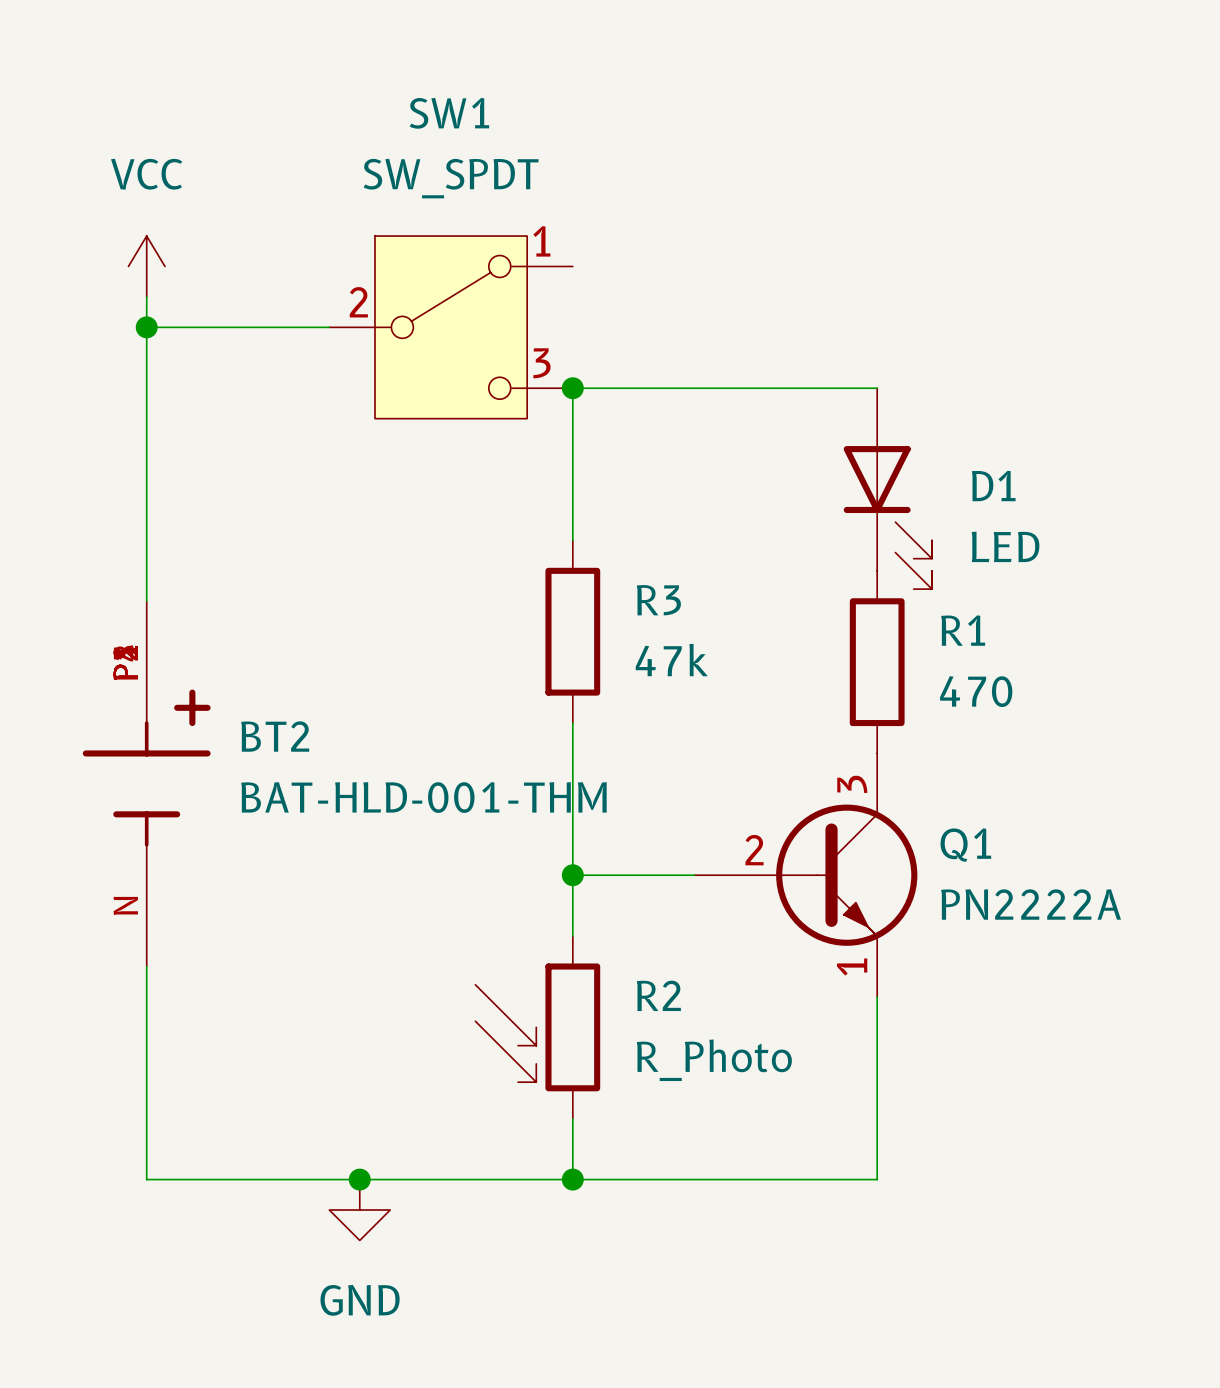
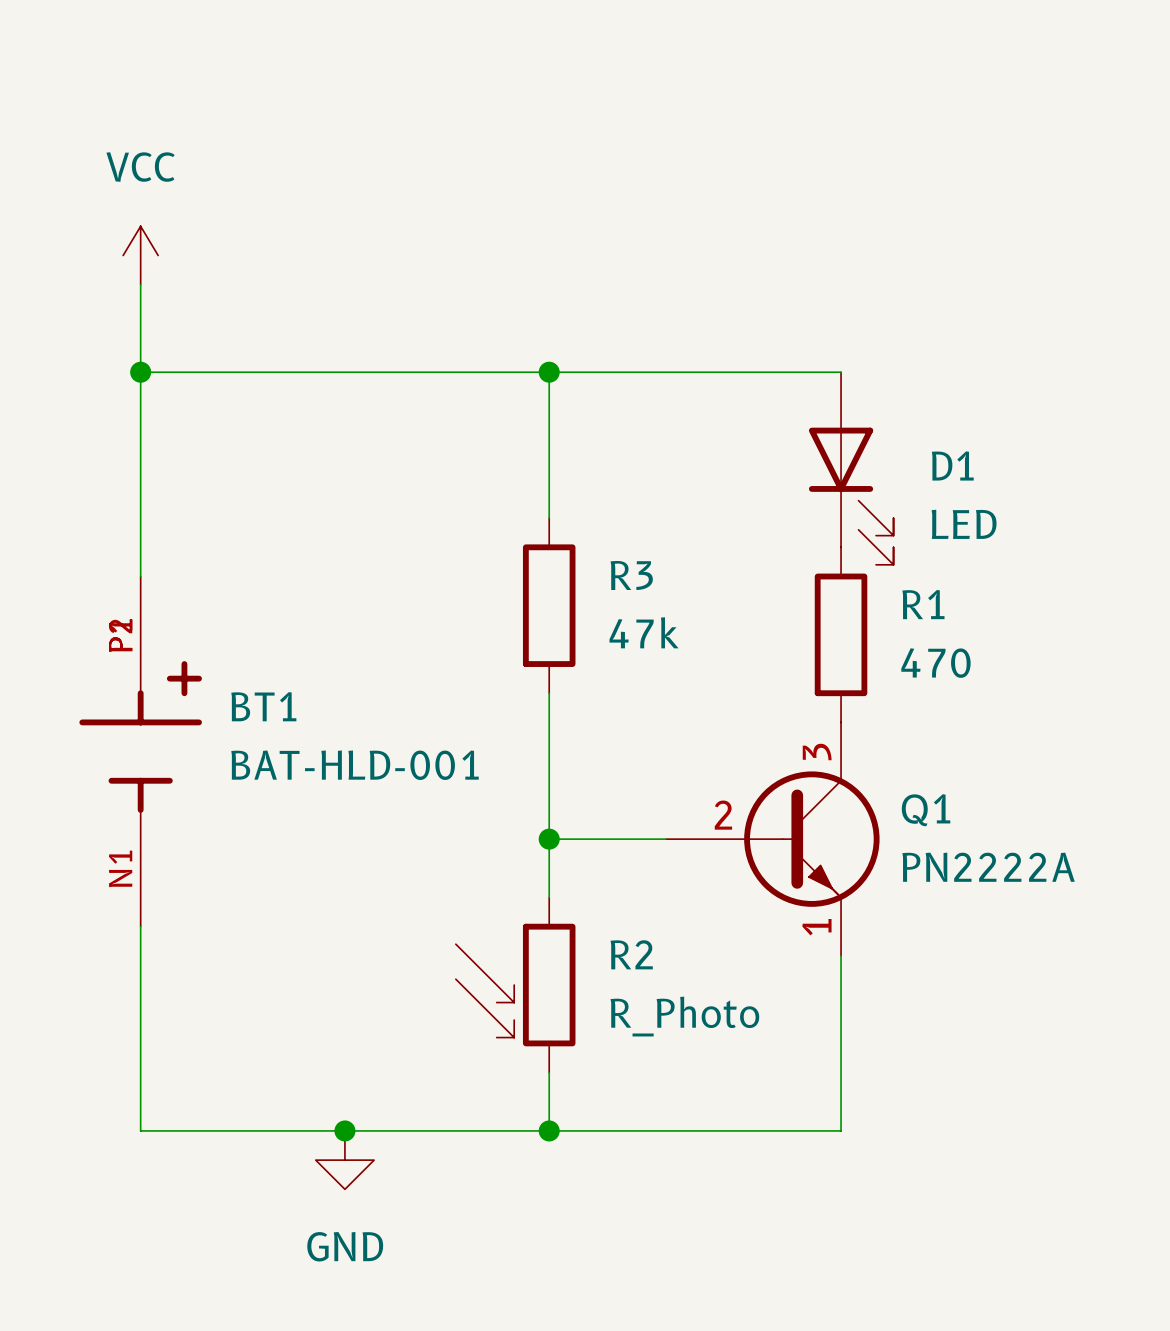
wire: (146, 327) (329, 327) -> none
junction position: (146, 327) -> (140, 372)
SW1: SW_SPDT (451, 327) -> none
wire: none -> (140, 372) (549, 372)
BT2: BAT-HLD-001-THM (146, 783) -> none
BT1: none -> BAT-HLD-001 (140, 751)

